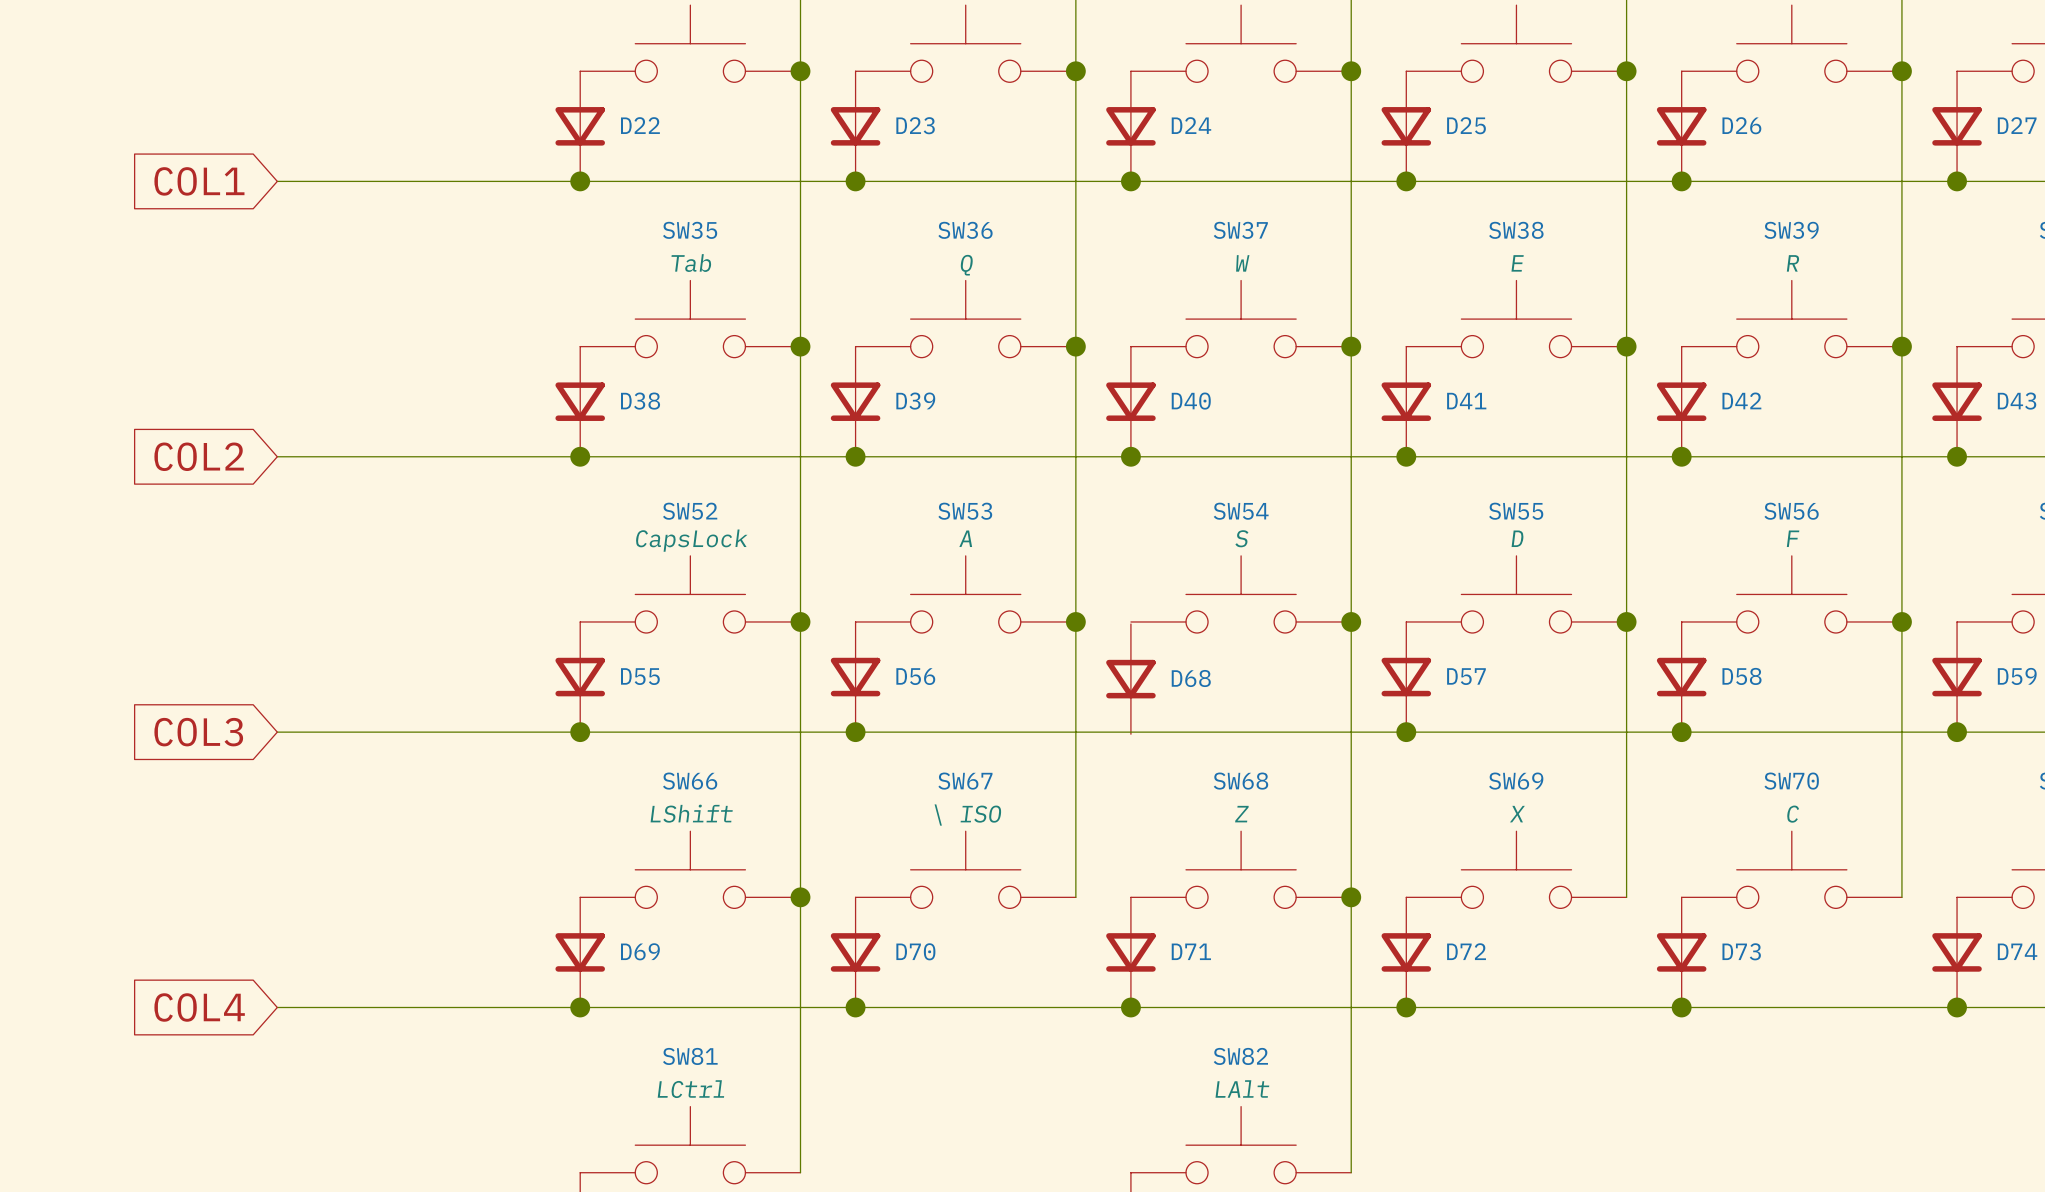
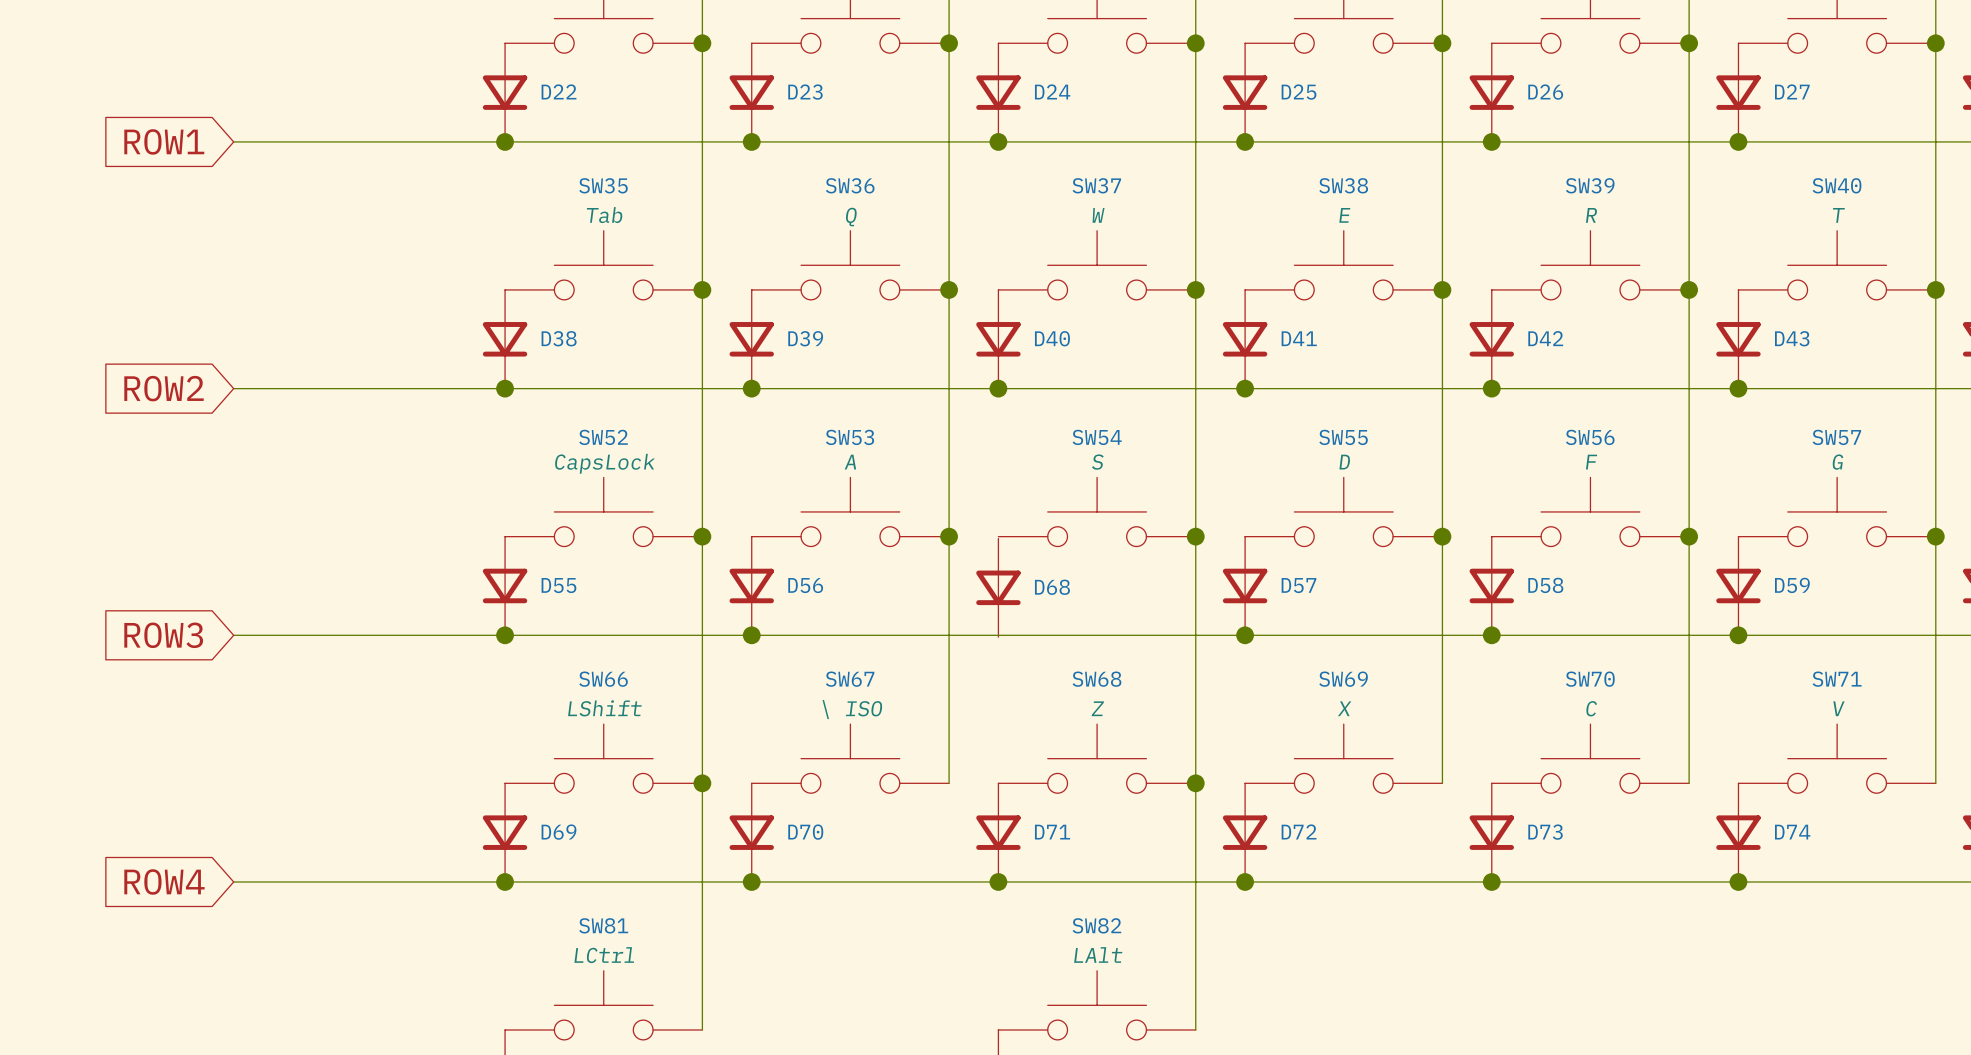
global label: COL1 (199, 181) -> ROW1 (164, 141)
global label: COL2 (199, 456) -> ROW2 (164, 388)
global label: COL3 (198, 732) -> ROW3 (163, 635)
global label: COL4 (199, 1007) -> ROW4 (164, 881)

